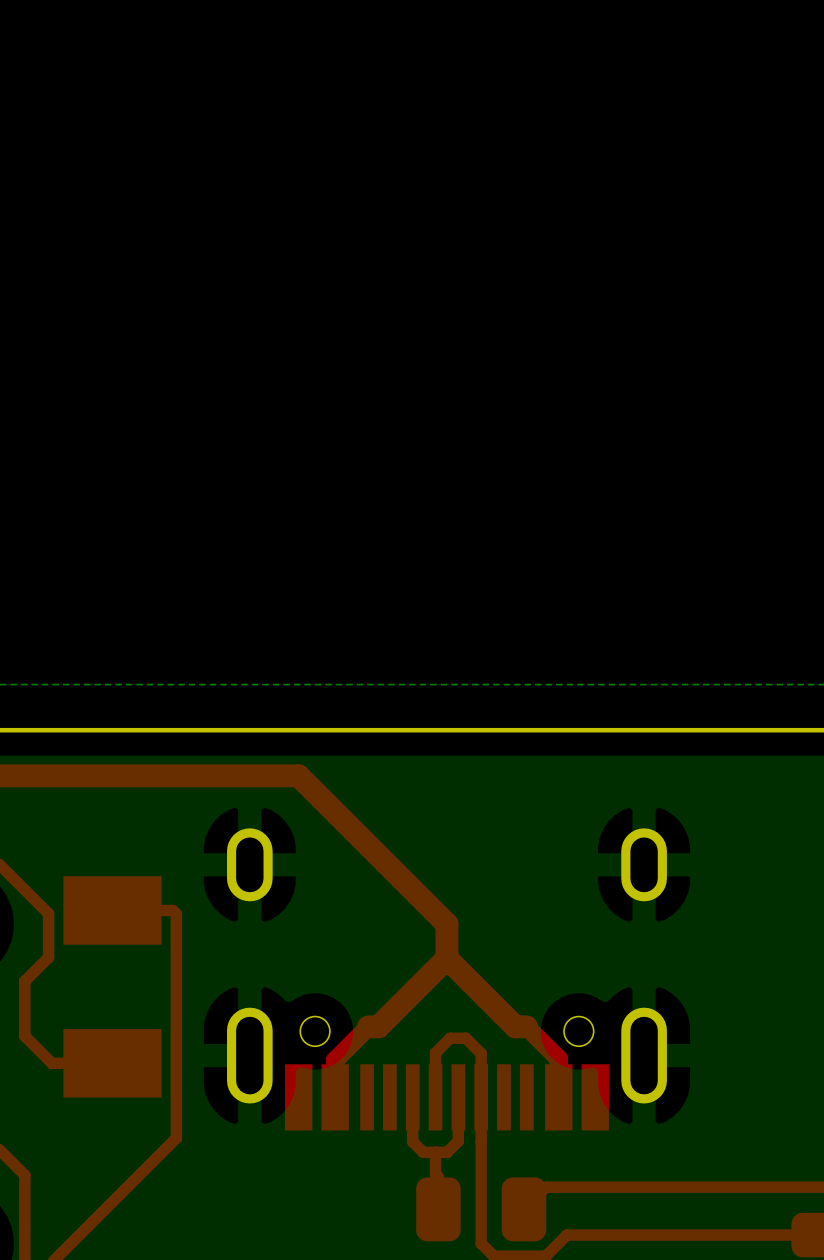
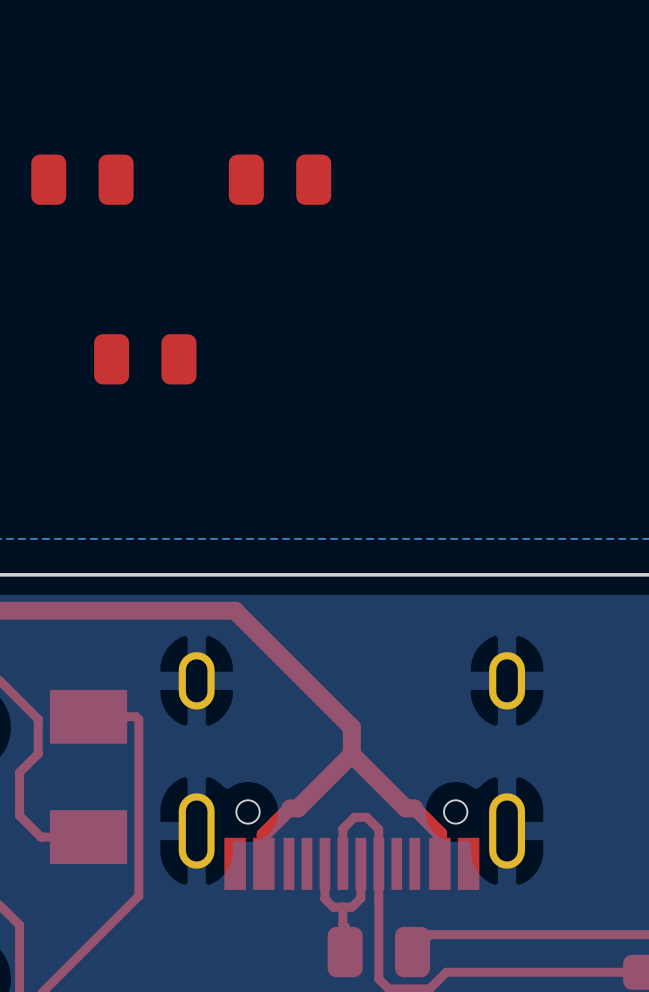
part: none -> (82, 179)
part: none -> (280, 179)
part: none -> (145, 359)

